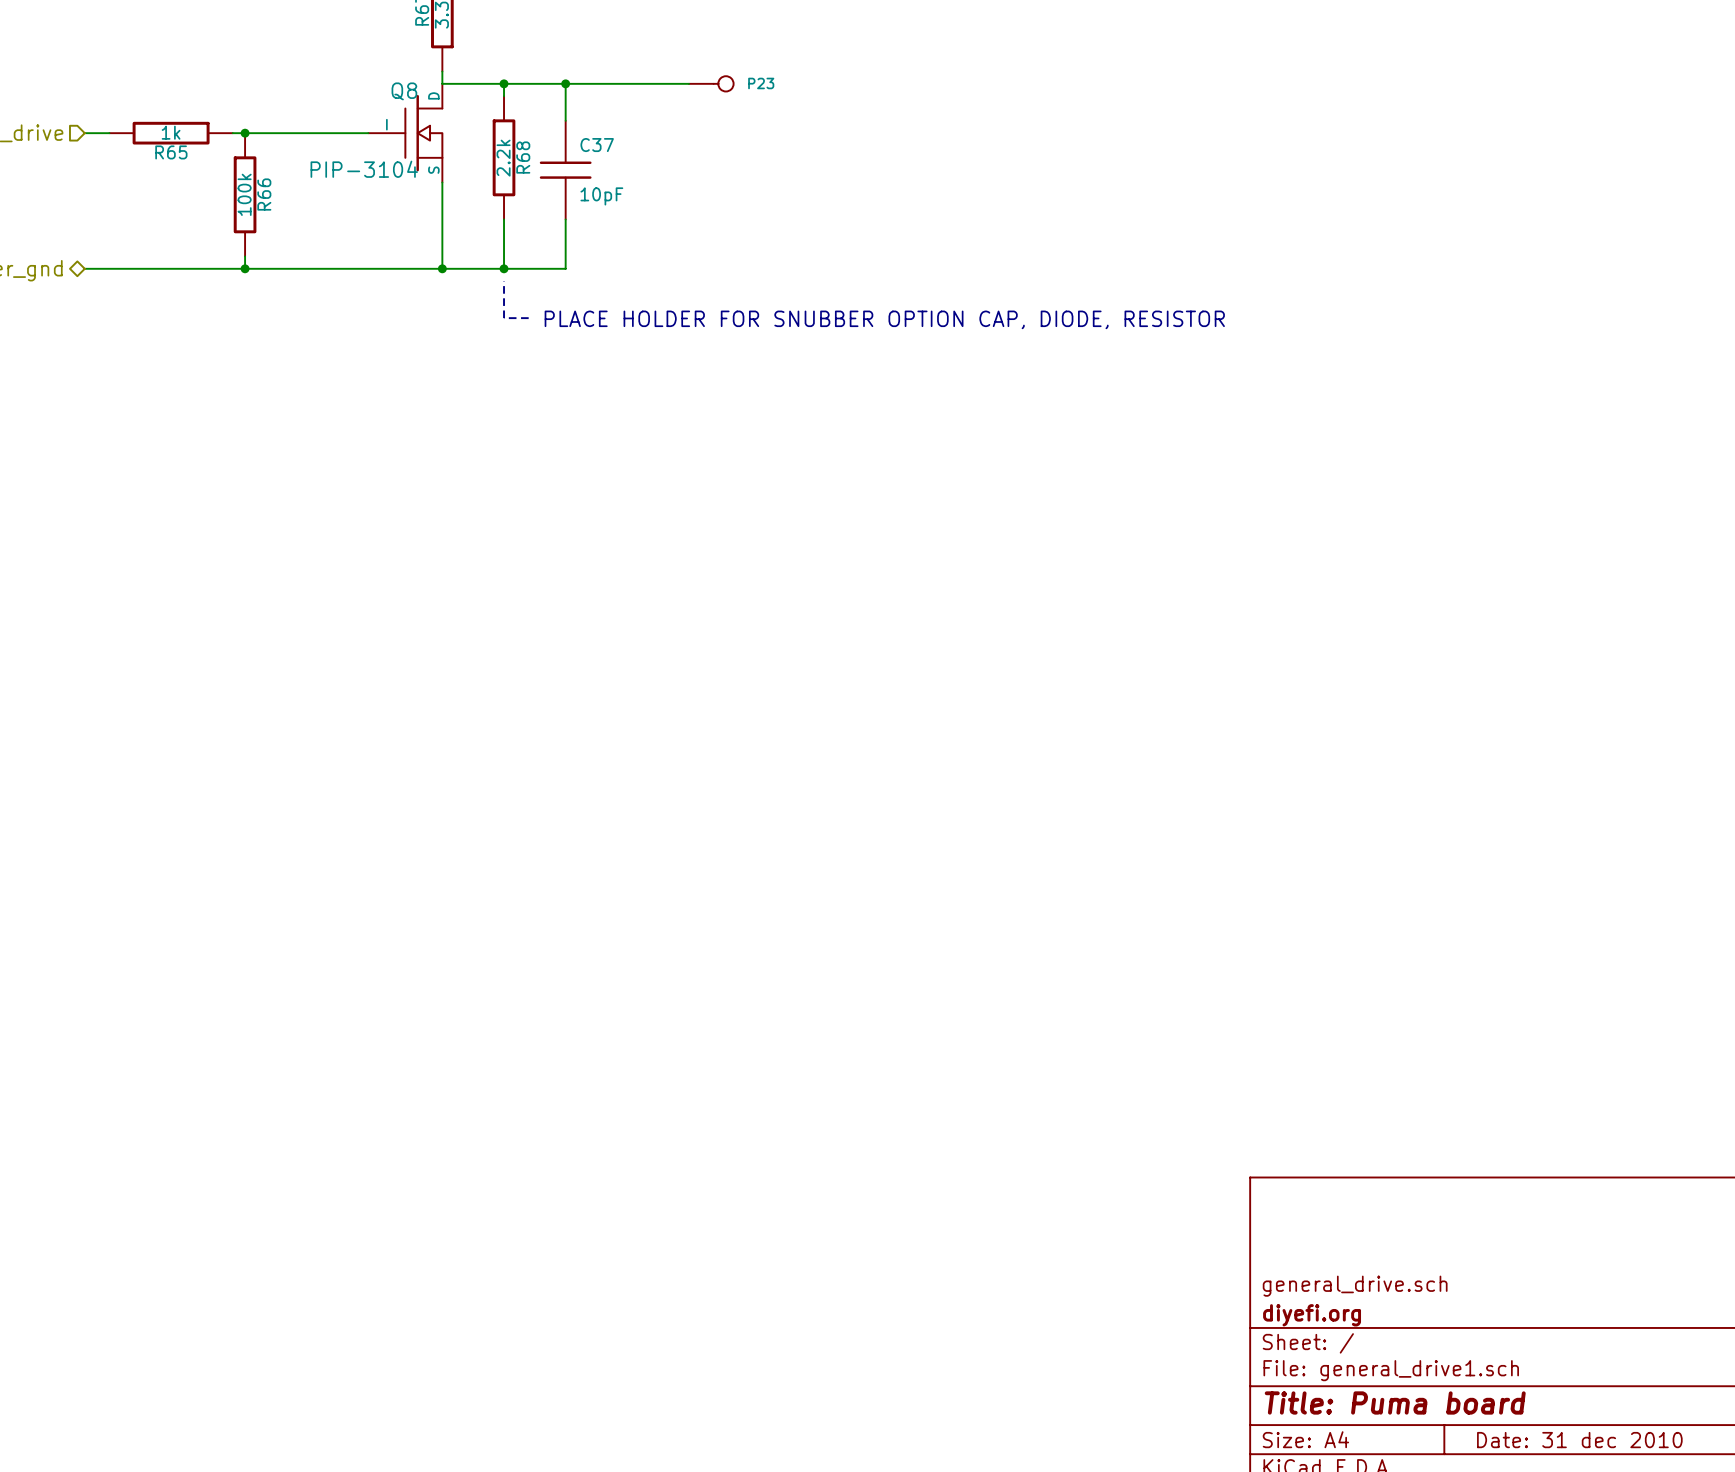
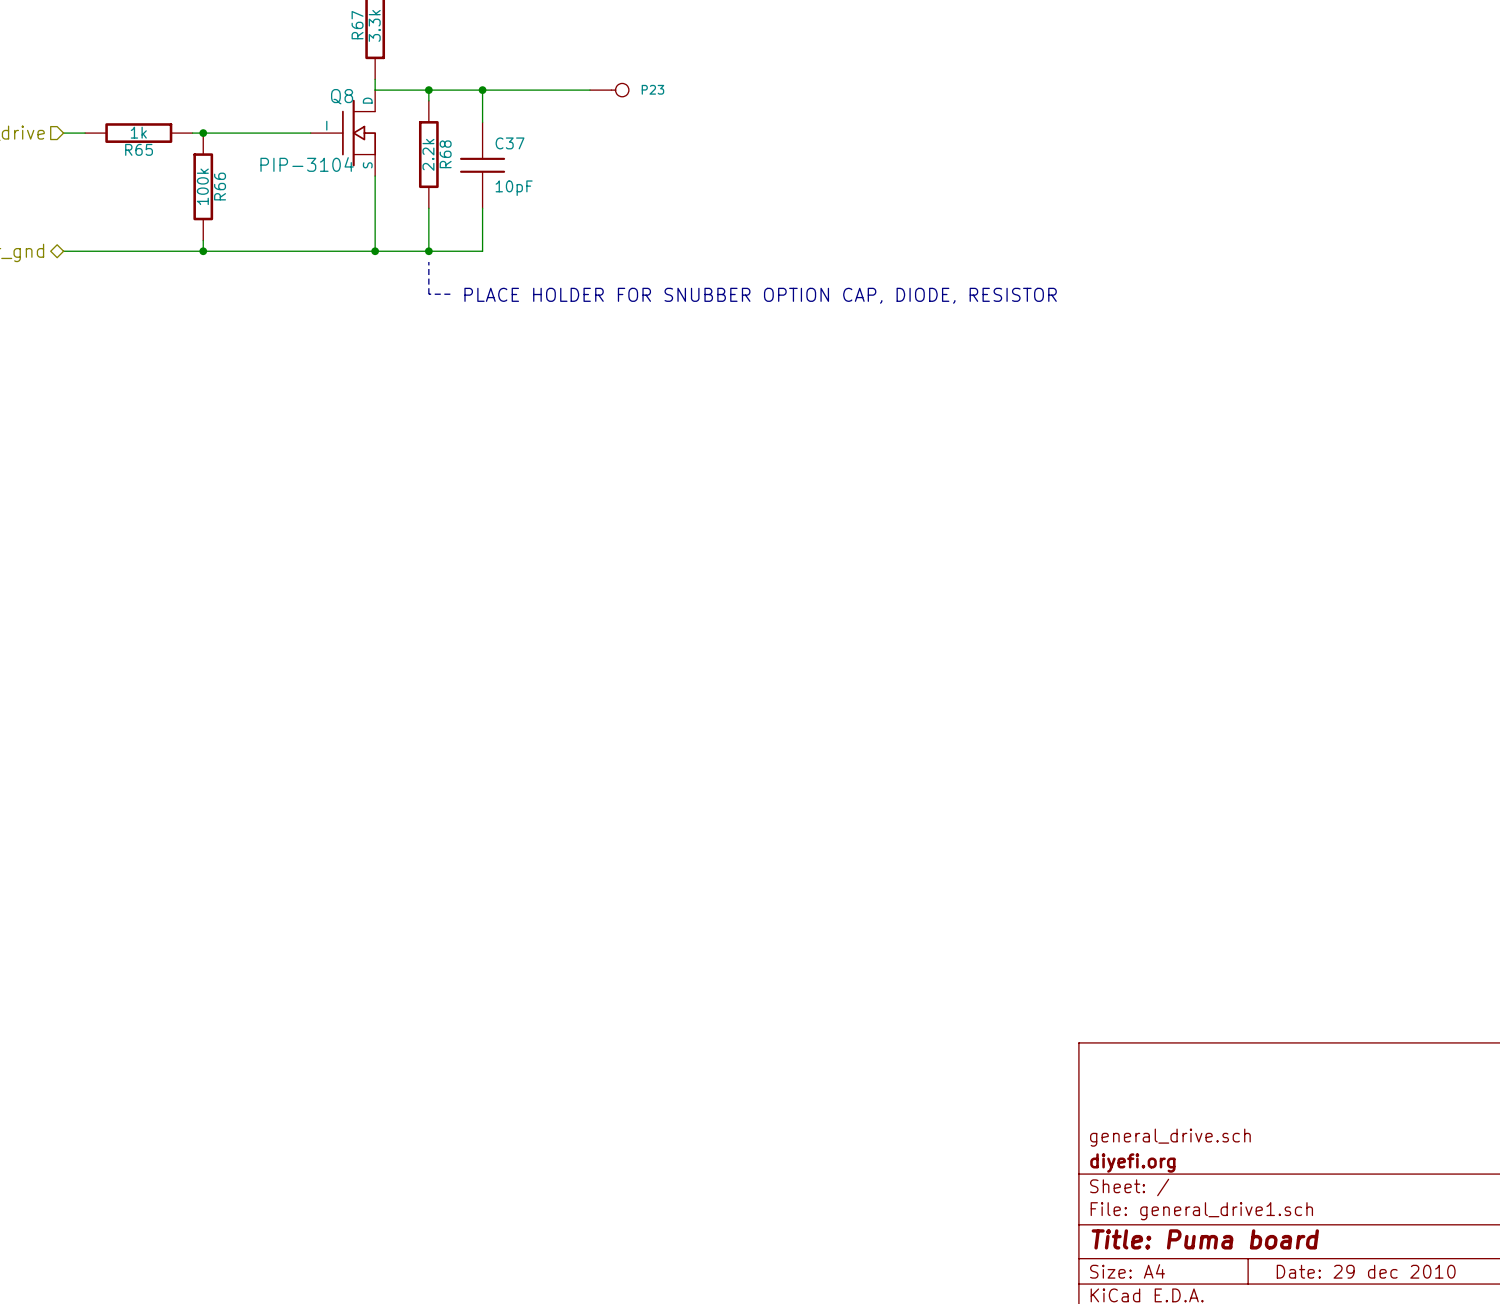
title block: Date: 31 dec 2010 (1579, 1440) -> Date: 29 dec 2010 (1366, 1271)

